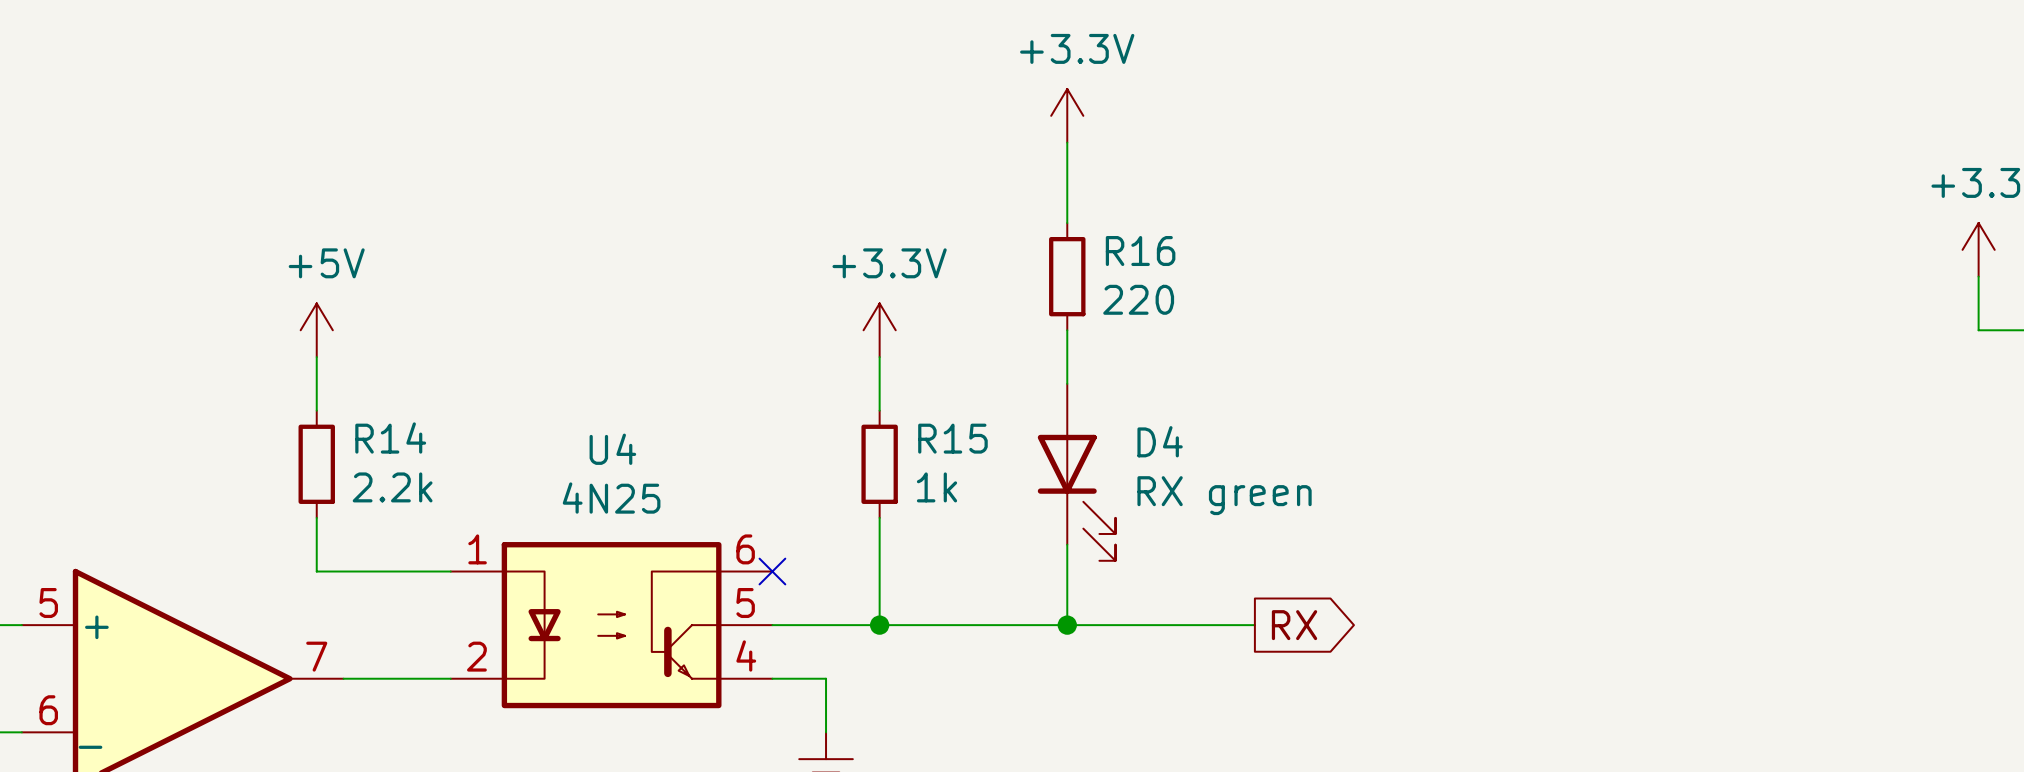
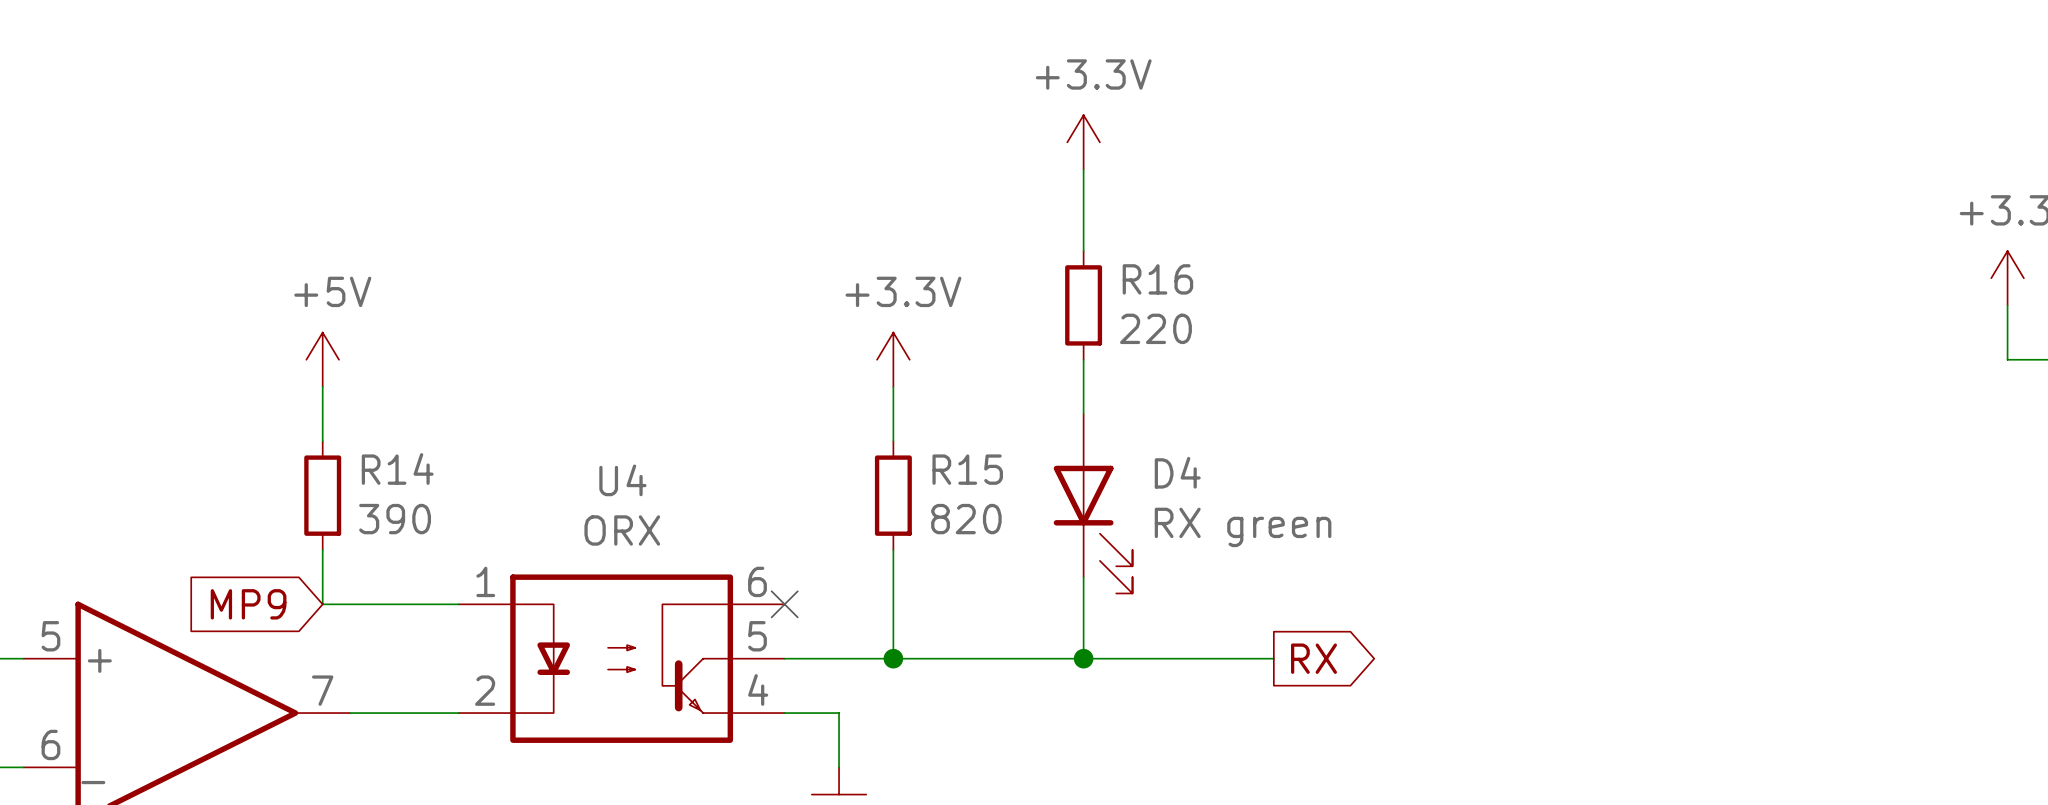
R14 value: 2.2k (392, 487) -> 390 (395, 519)
R15 value: 1k (937, 487) -> 820 (966, 519)
U4 value: 4N25 (611, 498) -> ORX (622, 530)
global label: none -> MP9 (248, 604)

